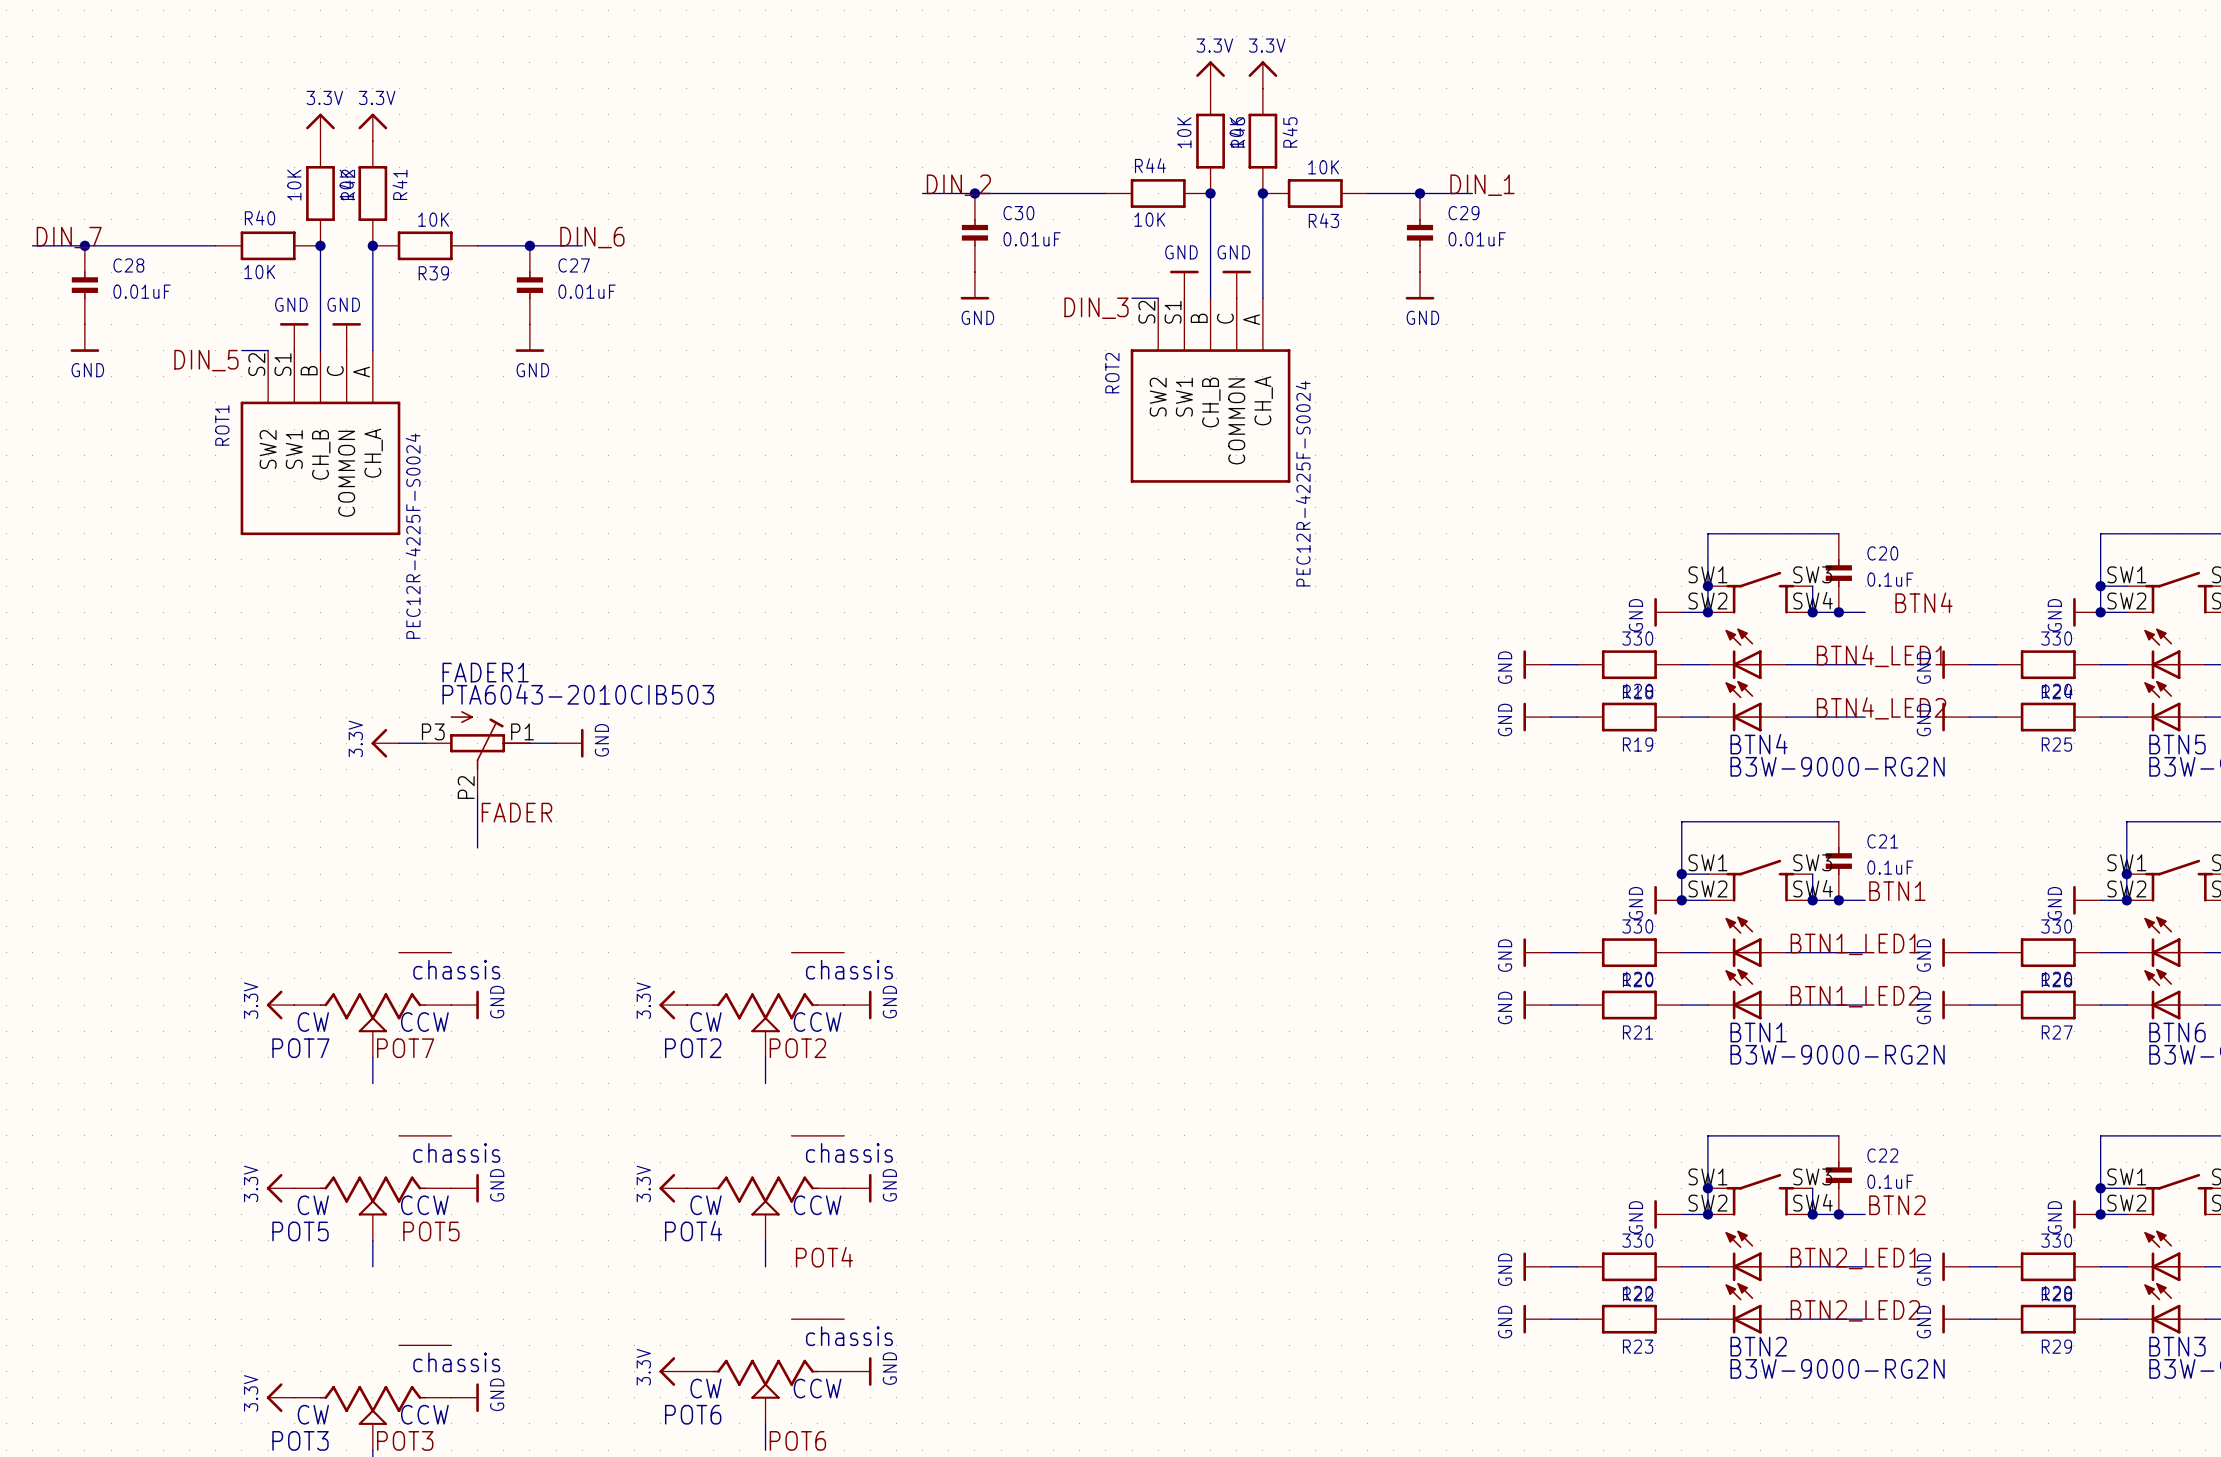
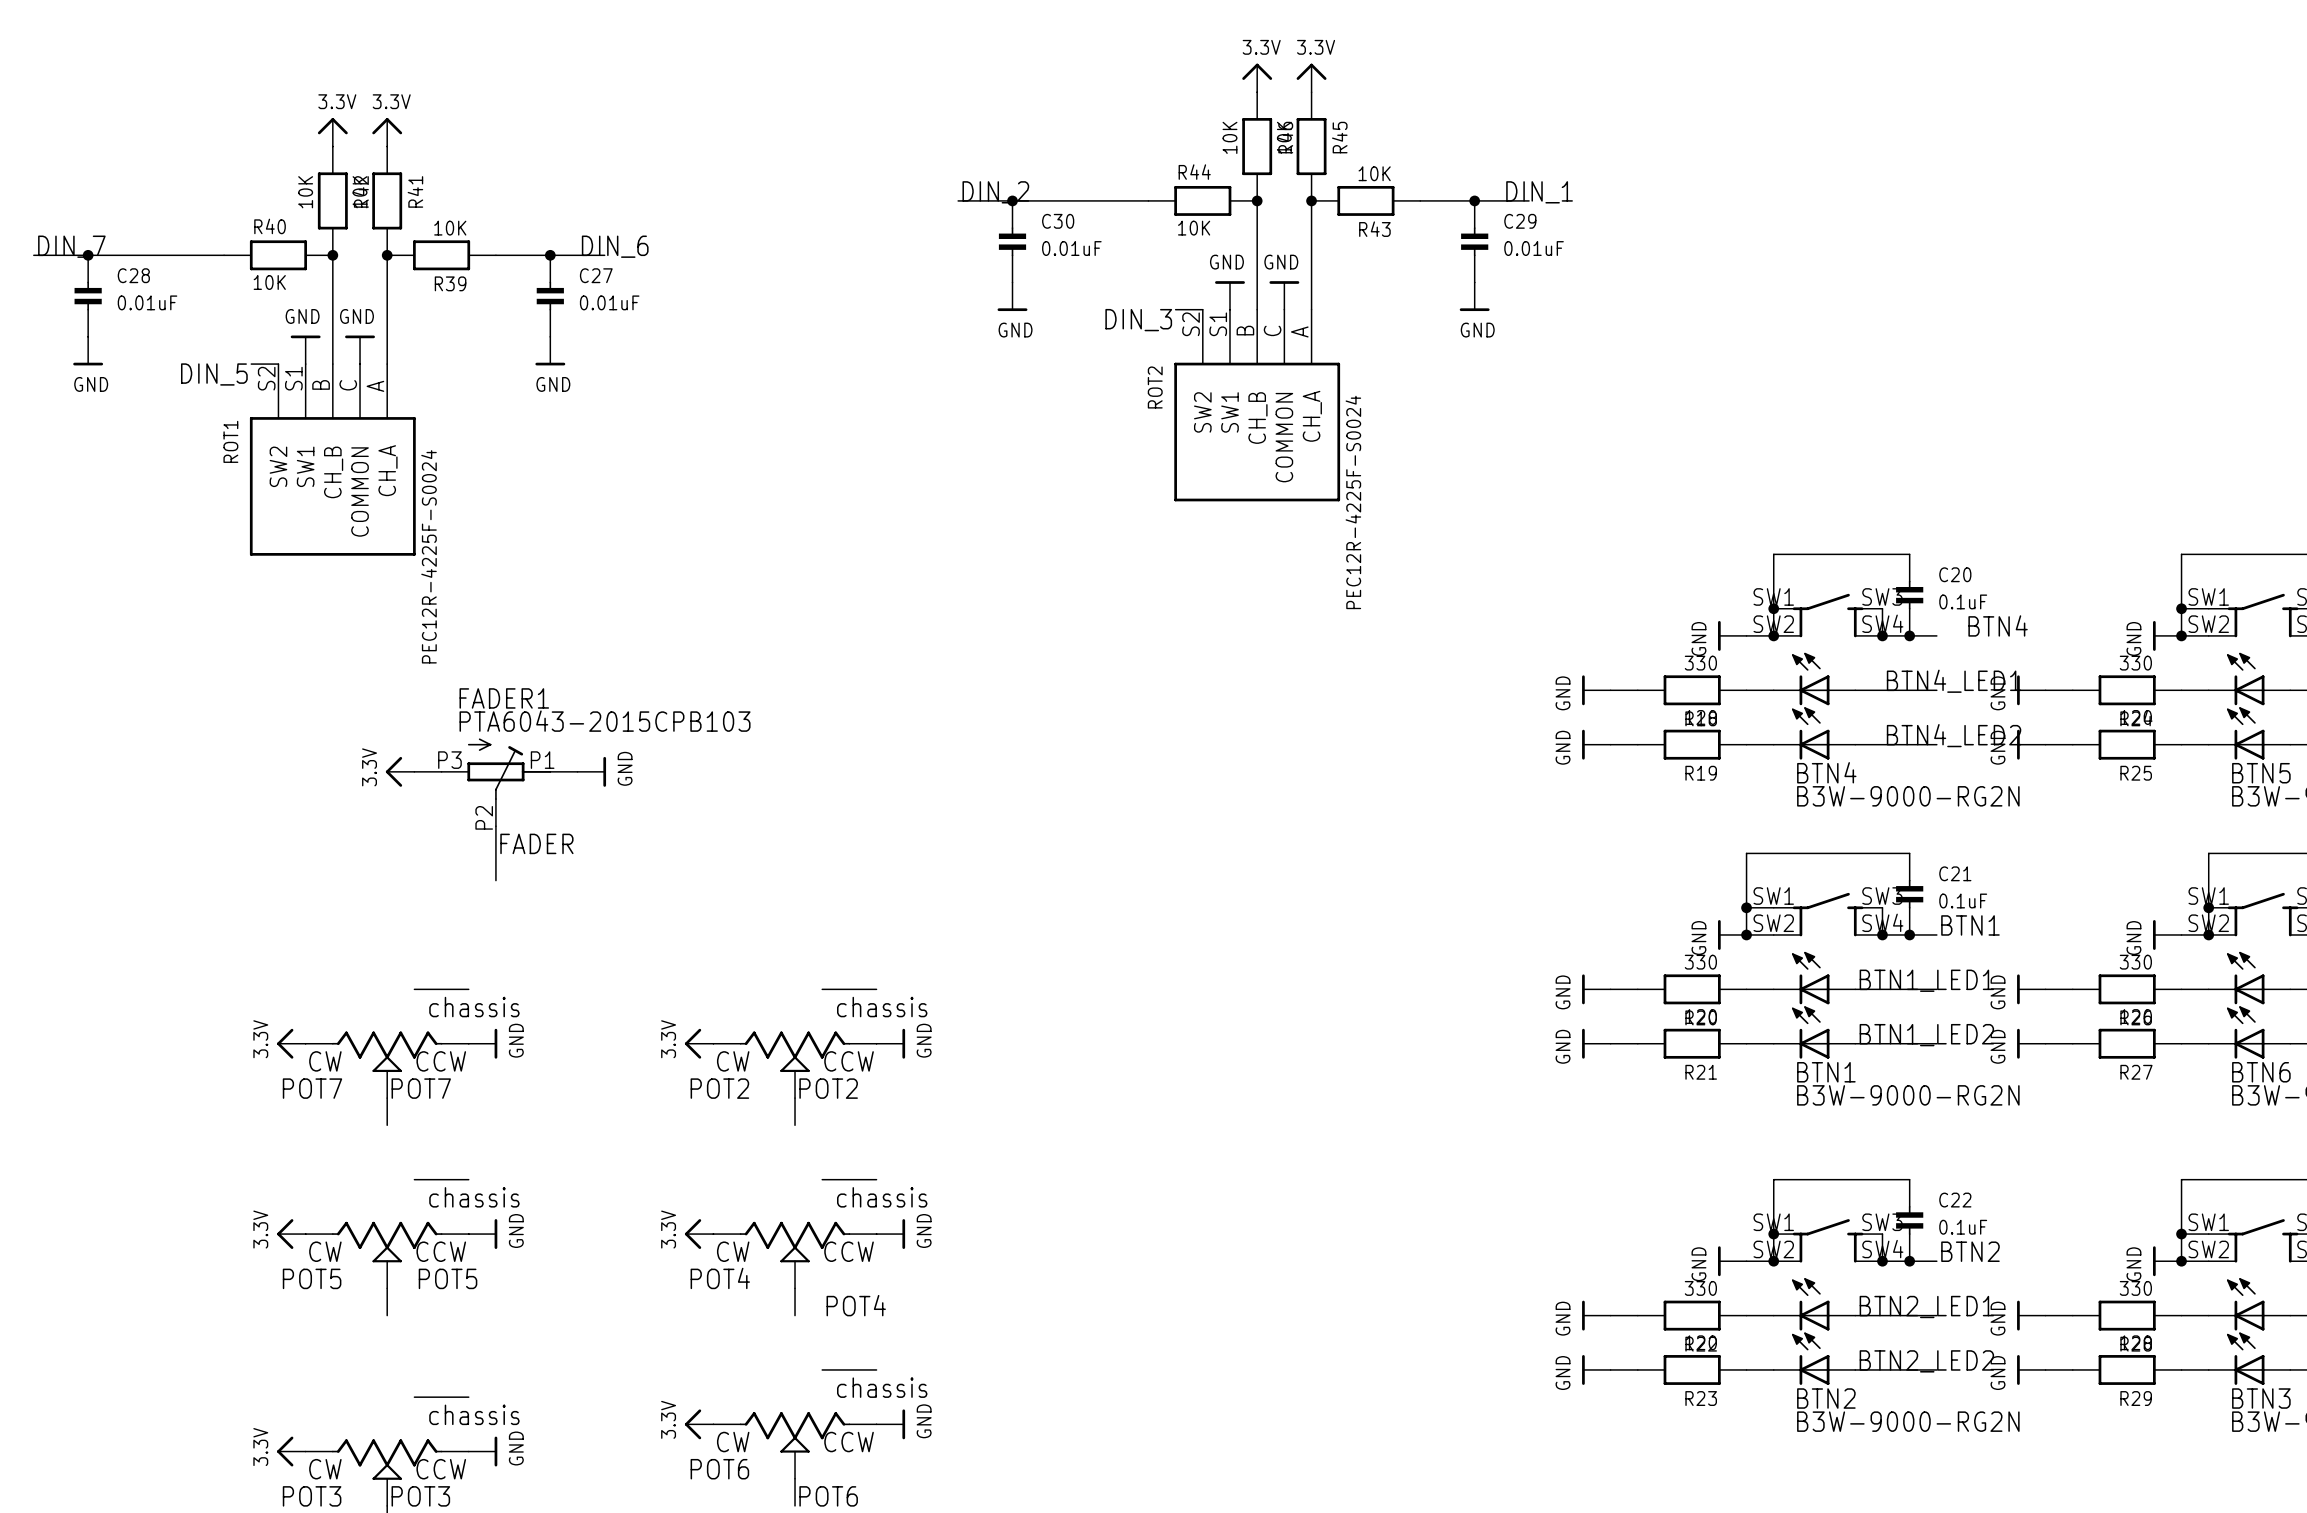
FADER1 value: PTA6043-2010CIB503 (578, 694) -> PTA6043-2015CPB103 (605, 721)

